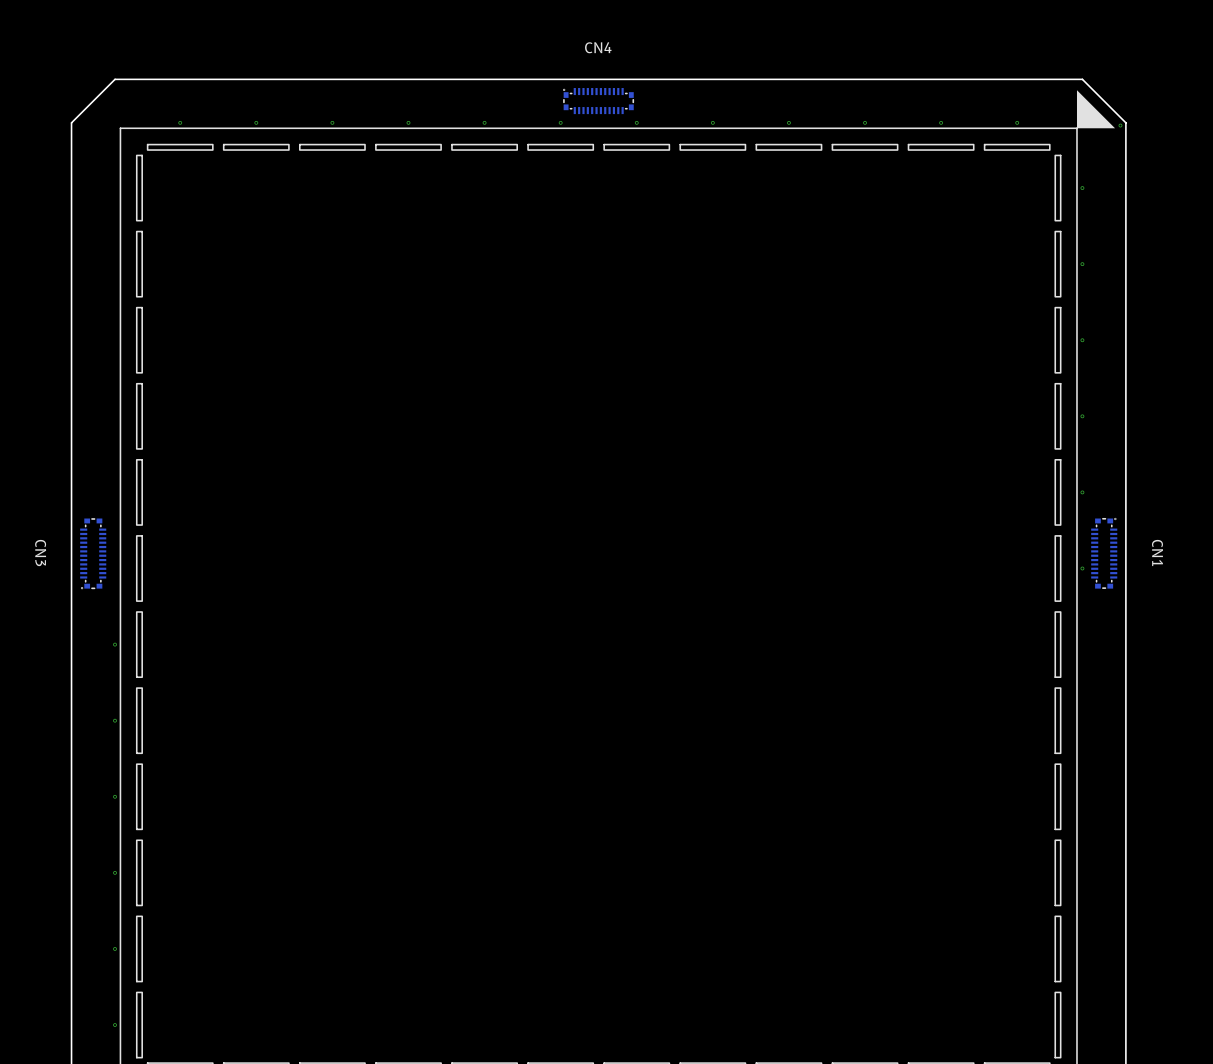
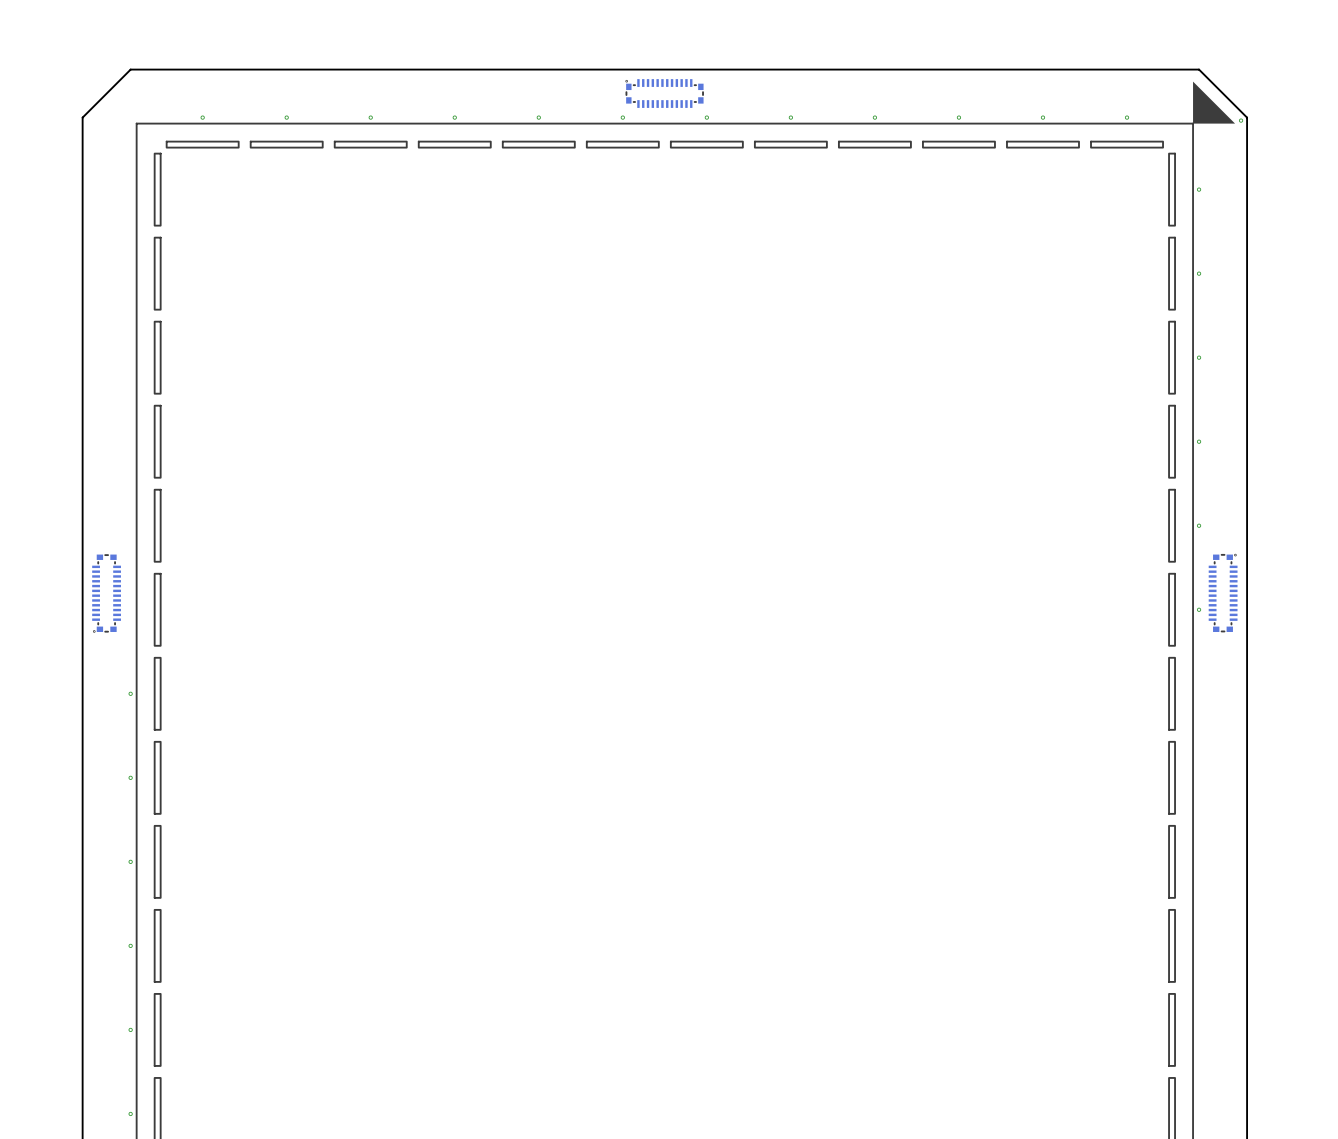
CN4 name: CN4 (598, 47) -> none
CN1 name: CN1 (1157, 552) -> none
CN3 name: CN3 (40, 553) -> none

